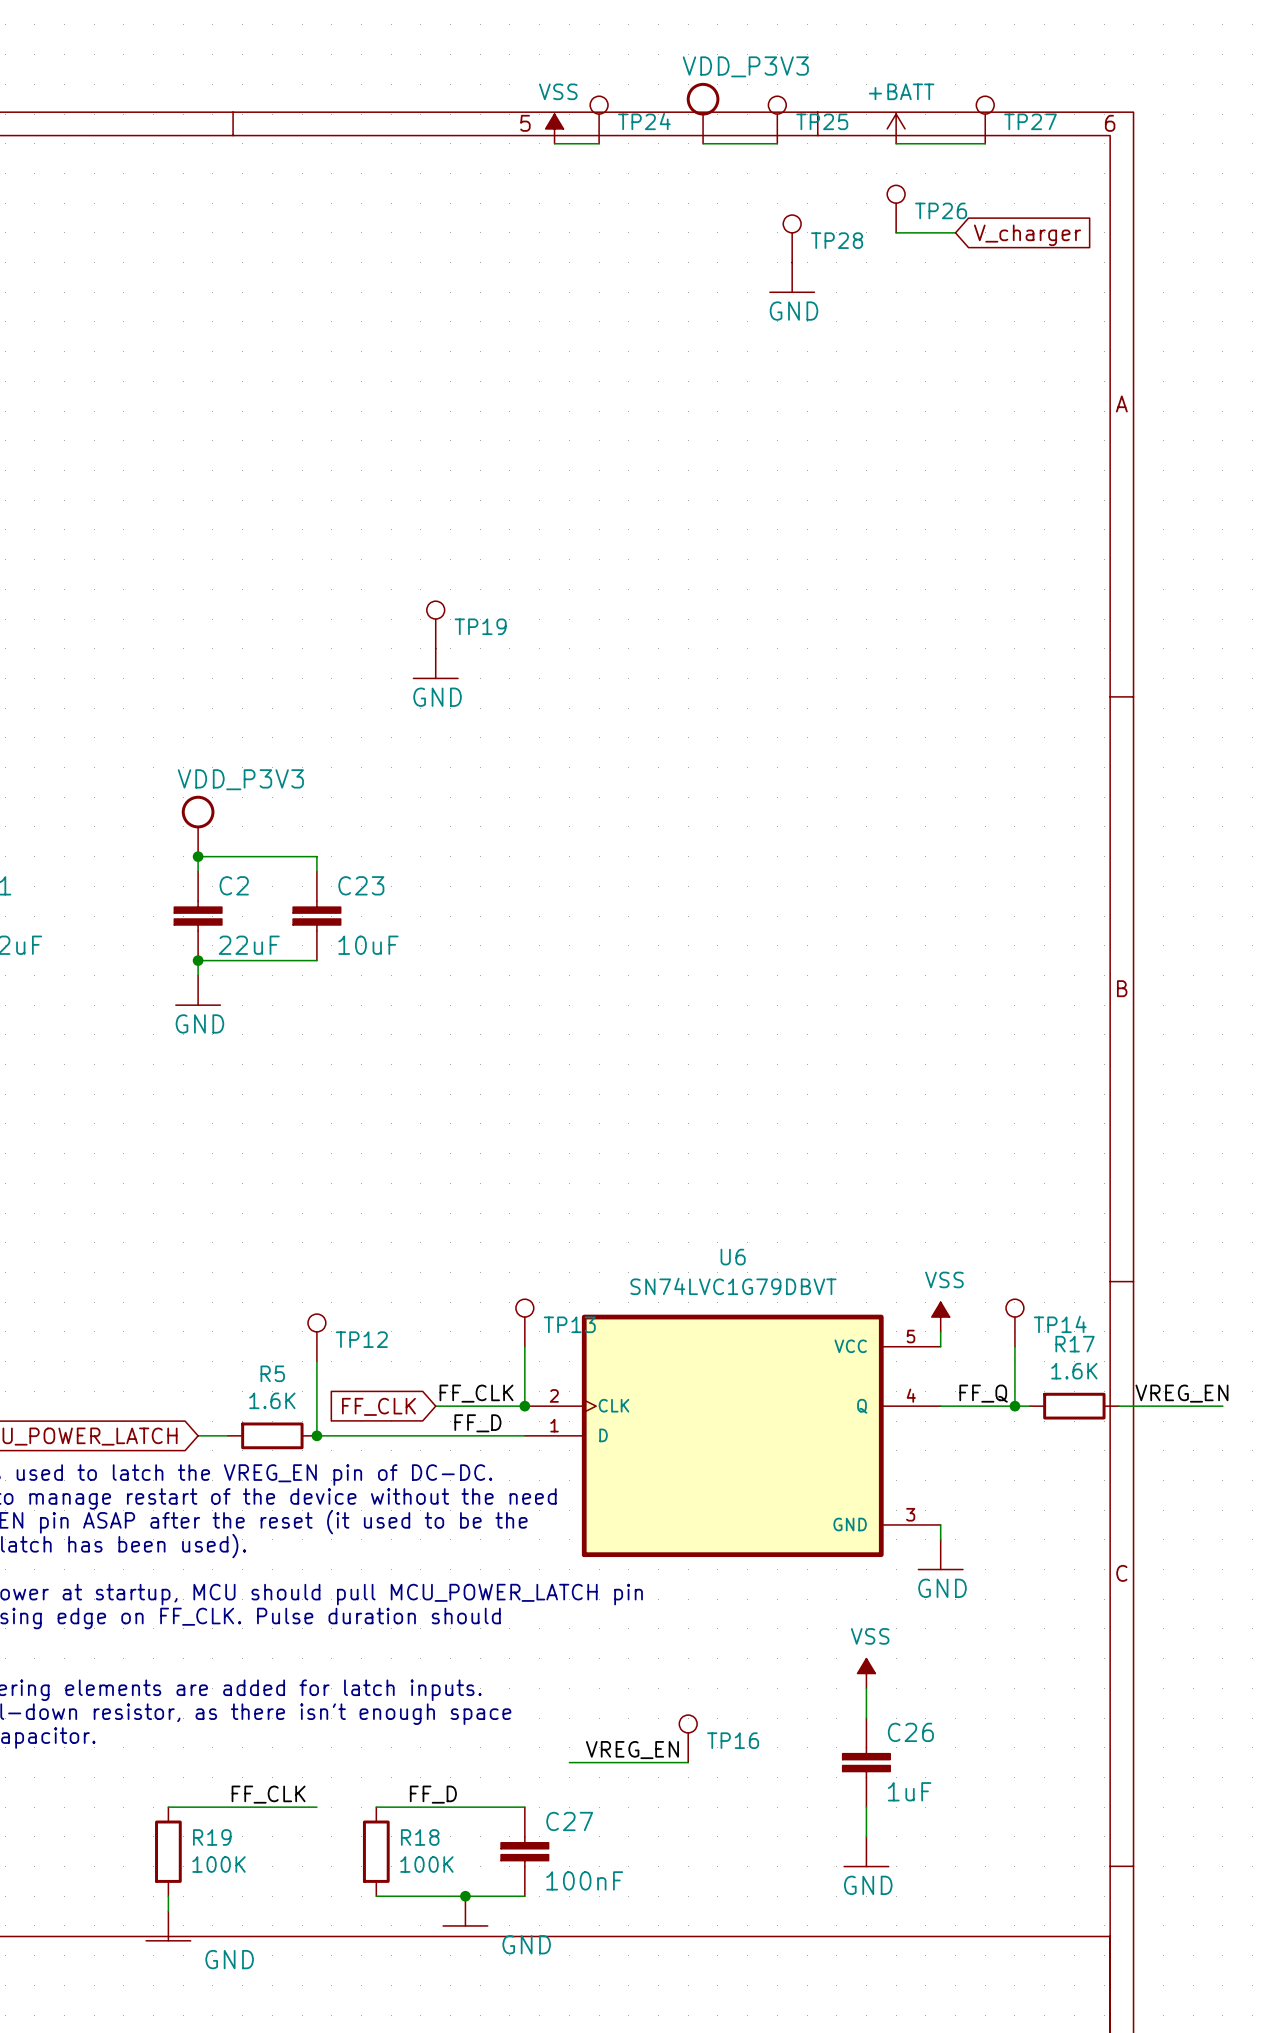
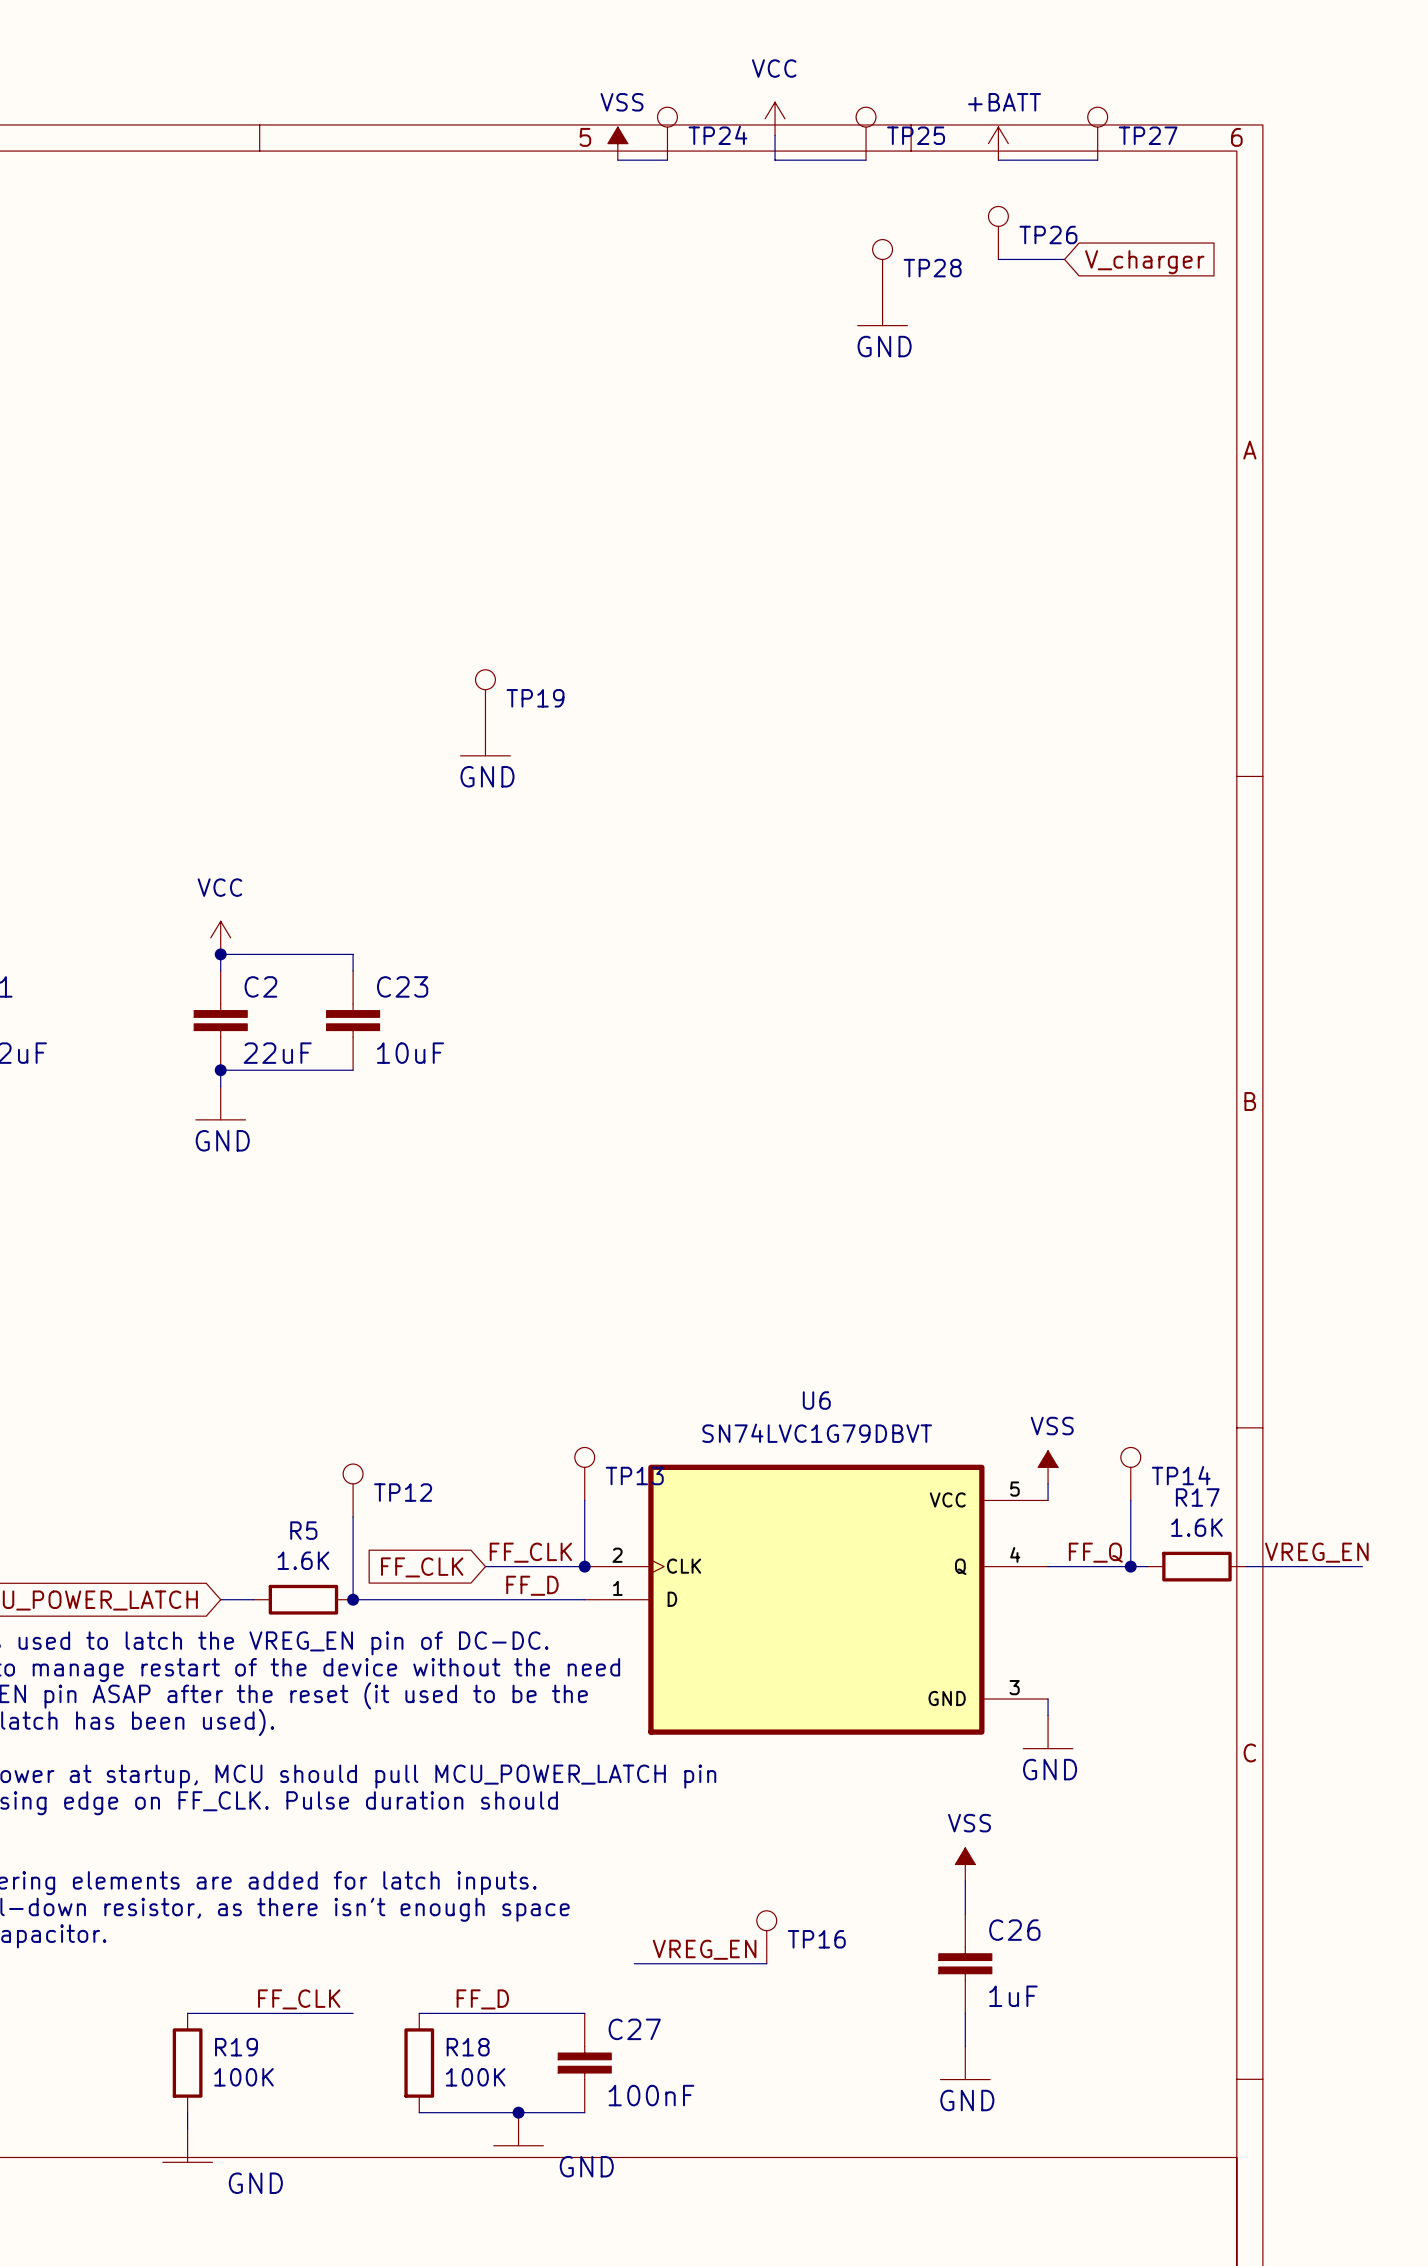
power symbol: VDD_P3V3 (703, 113) -> VCC (775, 118)
wire: none -> (775, 135) (775, 160) (783, 160)
power symbol: VDD_P3V3 (198, 826) -> none
power symbol: none -> VCC (220, 937)

